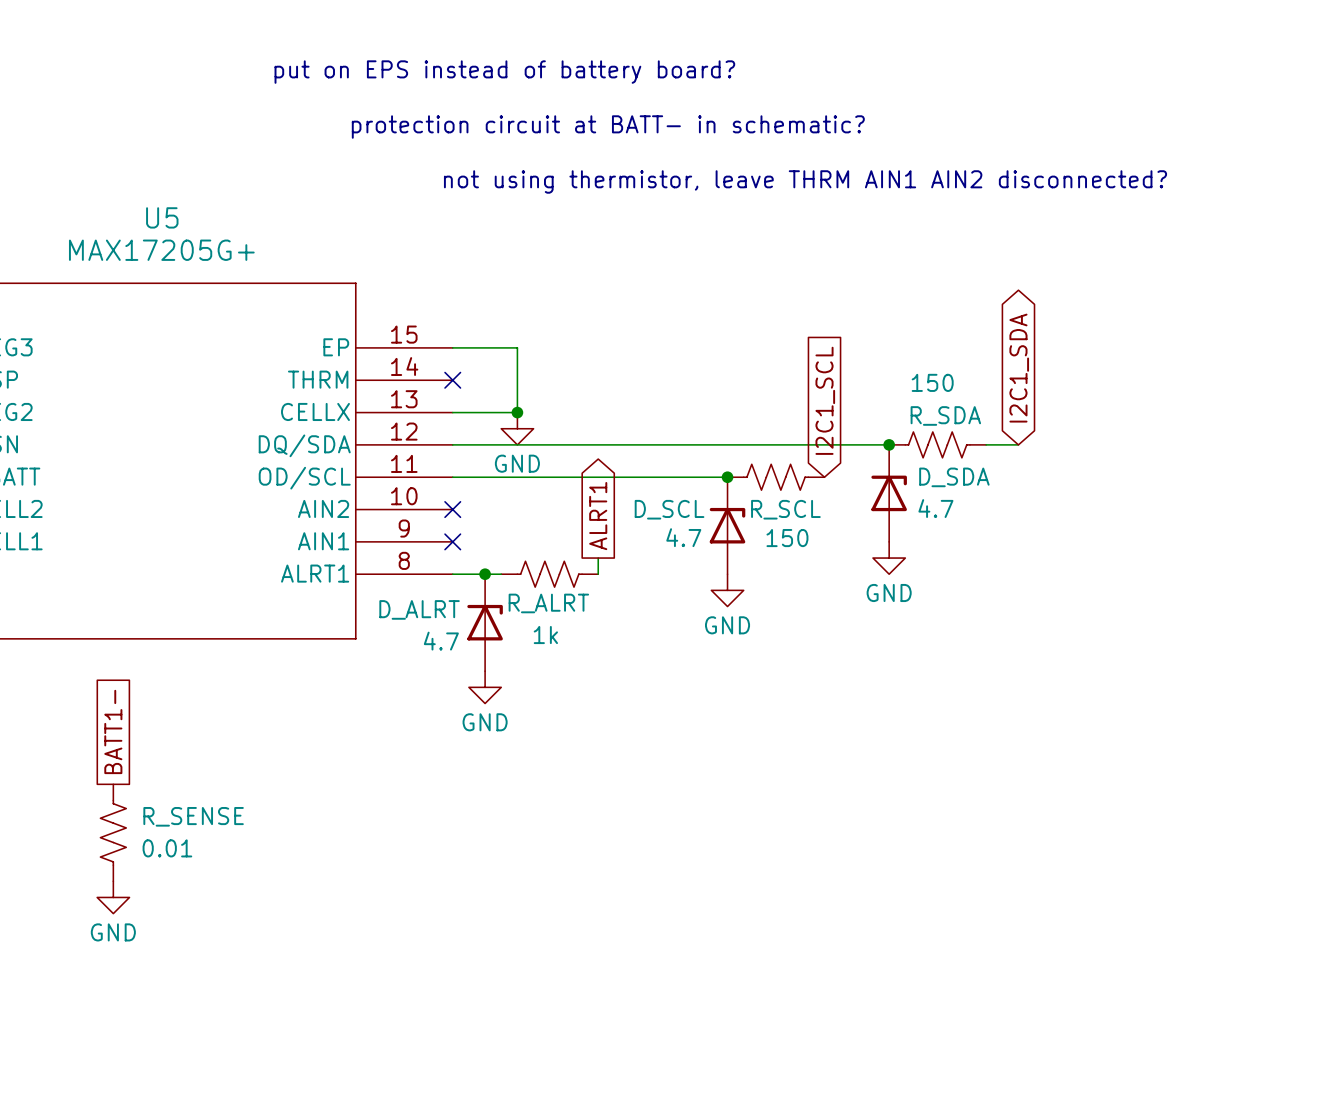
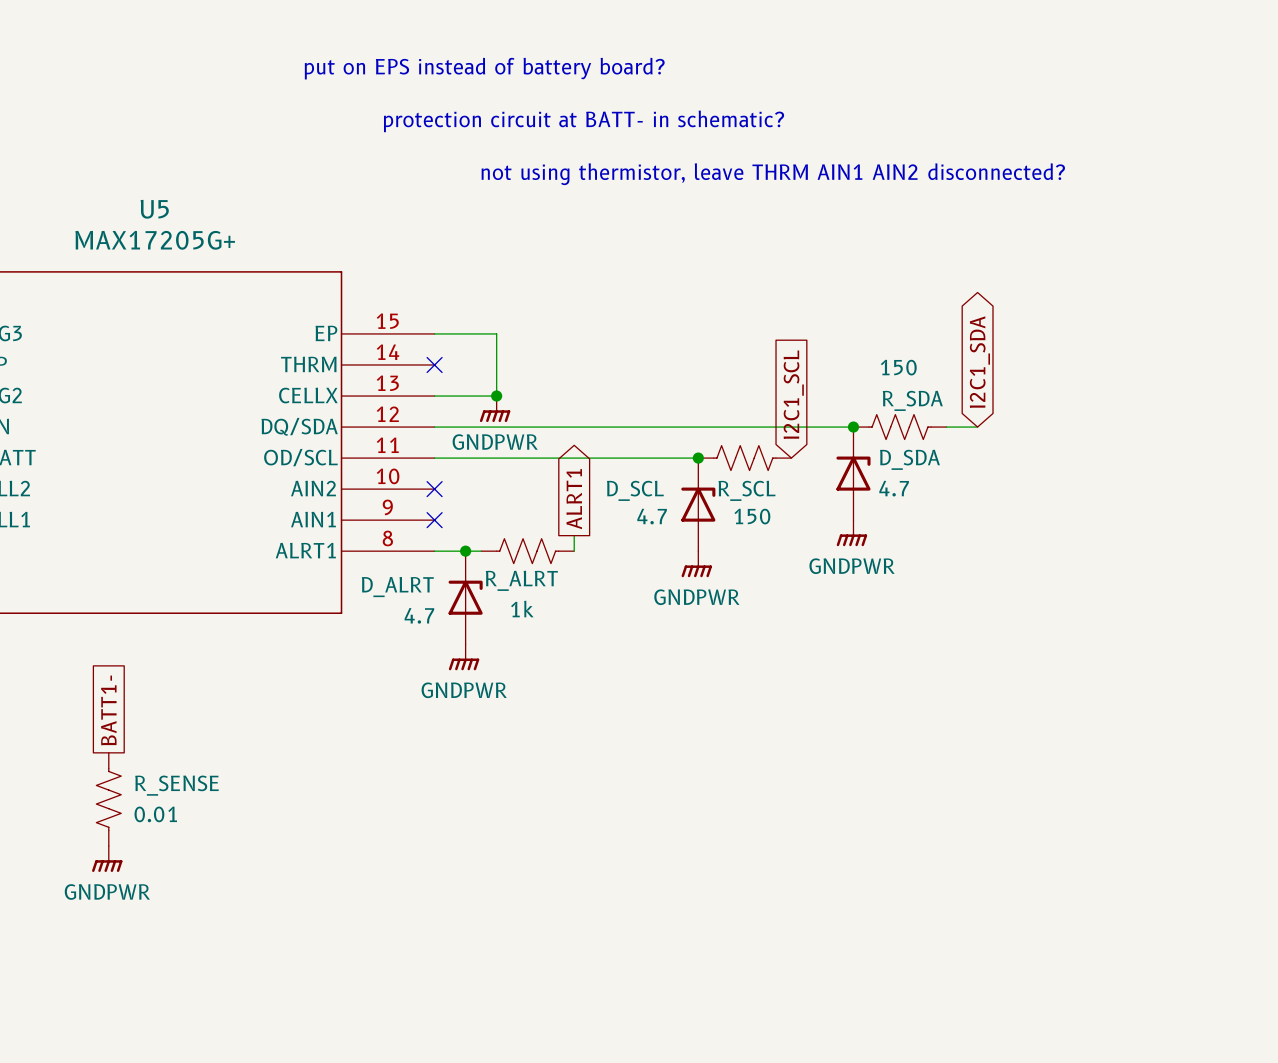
power symbol: GND (517, 428) -> GNDPWR (495, 409)
power symbol: GND (889, 558) -> GNDPWR (851, 533)
power symbol: GND (727, 590) -> GNDPWR (696, 564)
power symbol: GND (485, 687) -> GNDPWR (464, 657)
power symbol: GND (113, 897) -> GNDPWR (107, 858)

